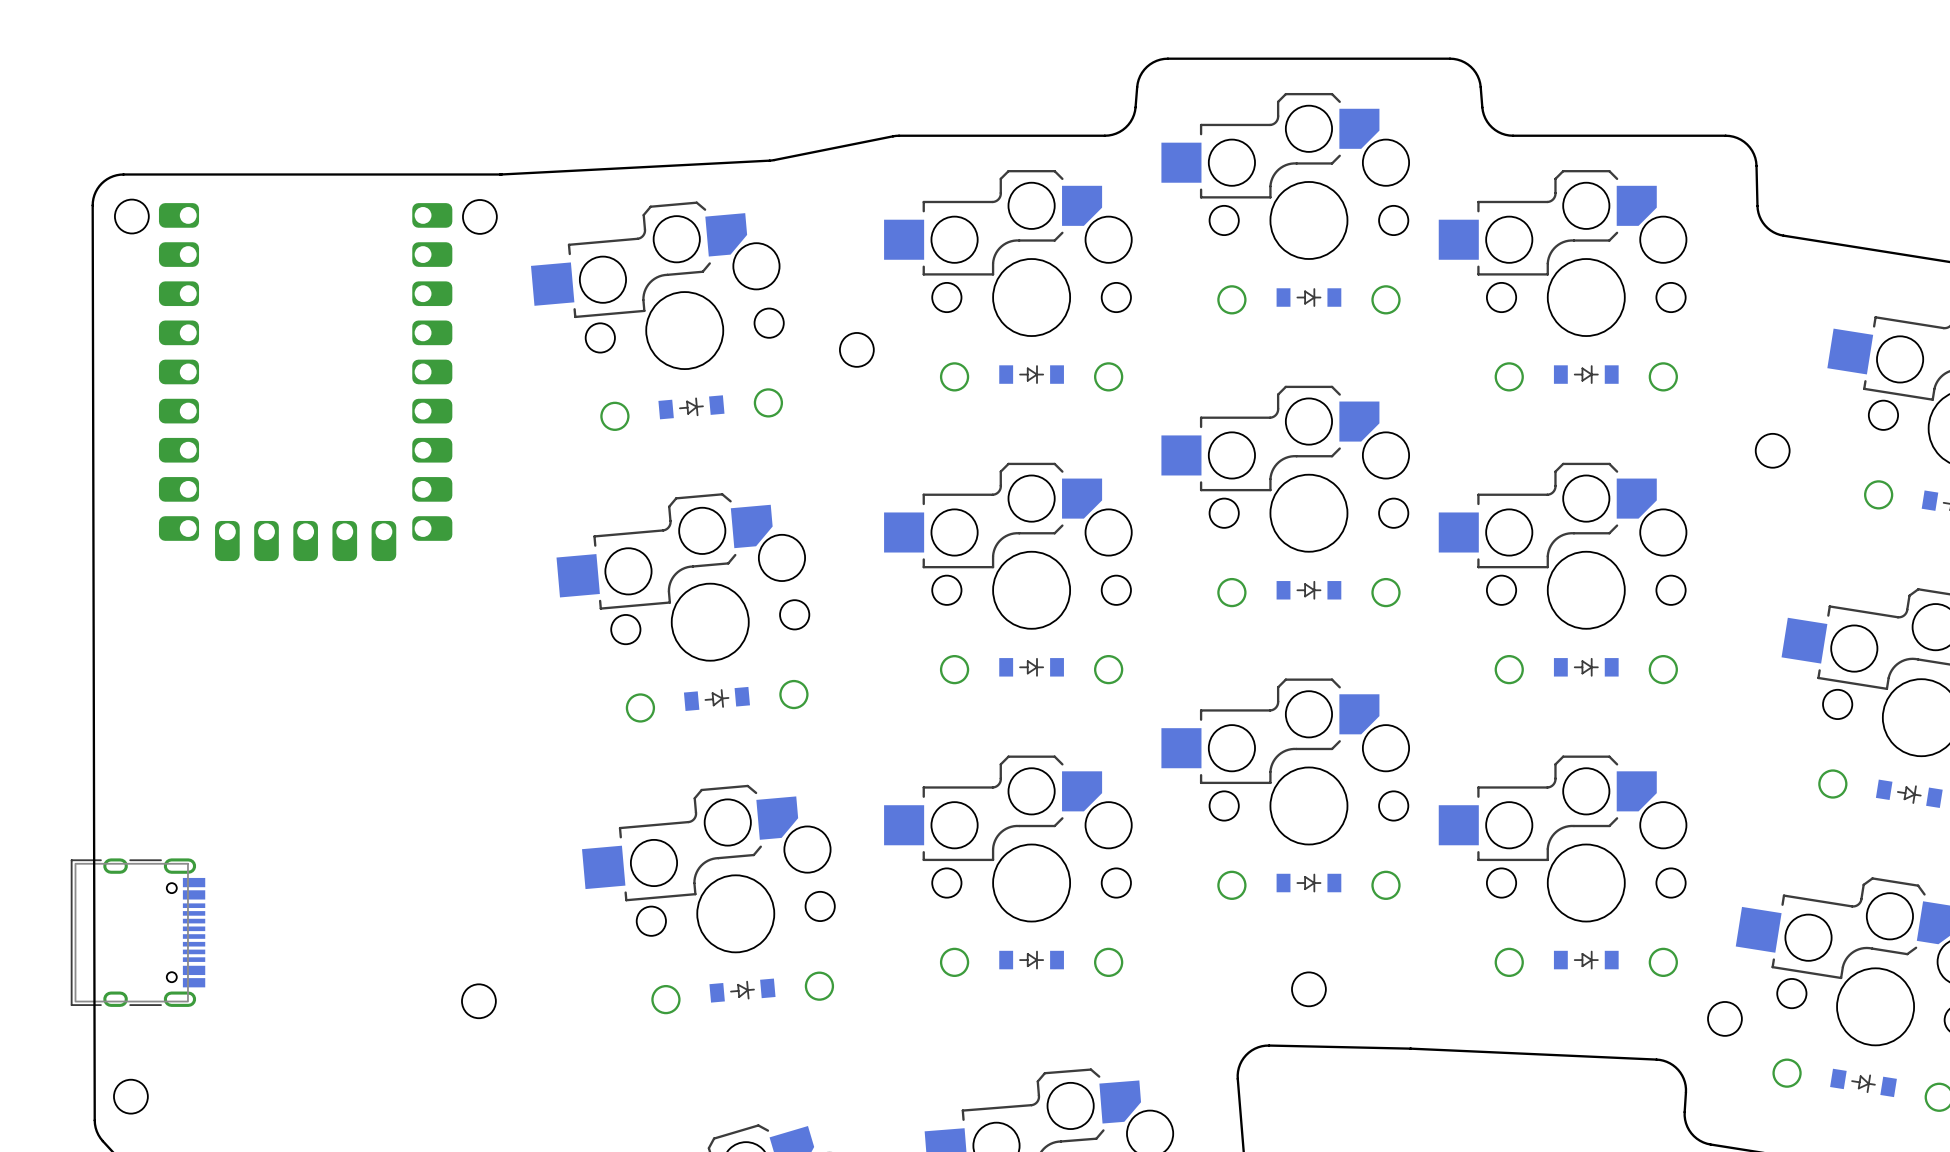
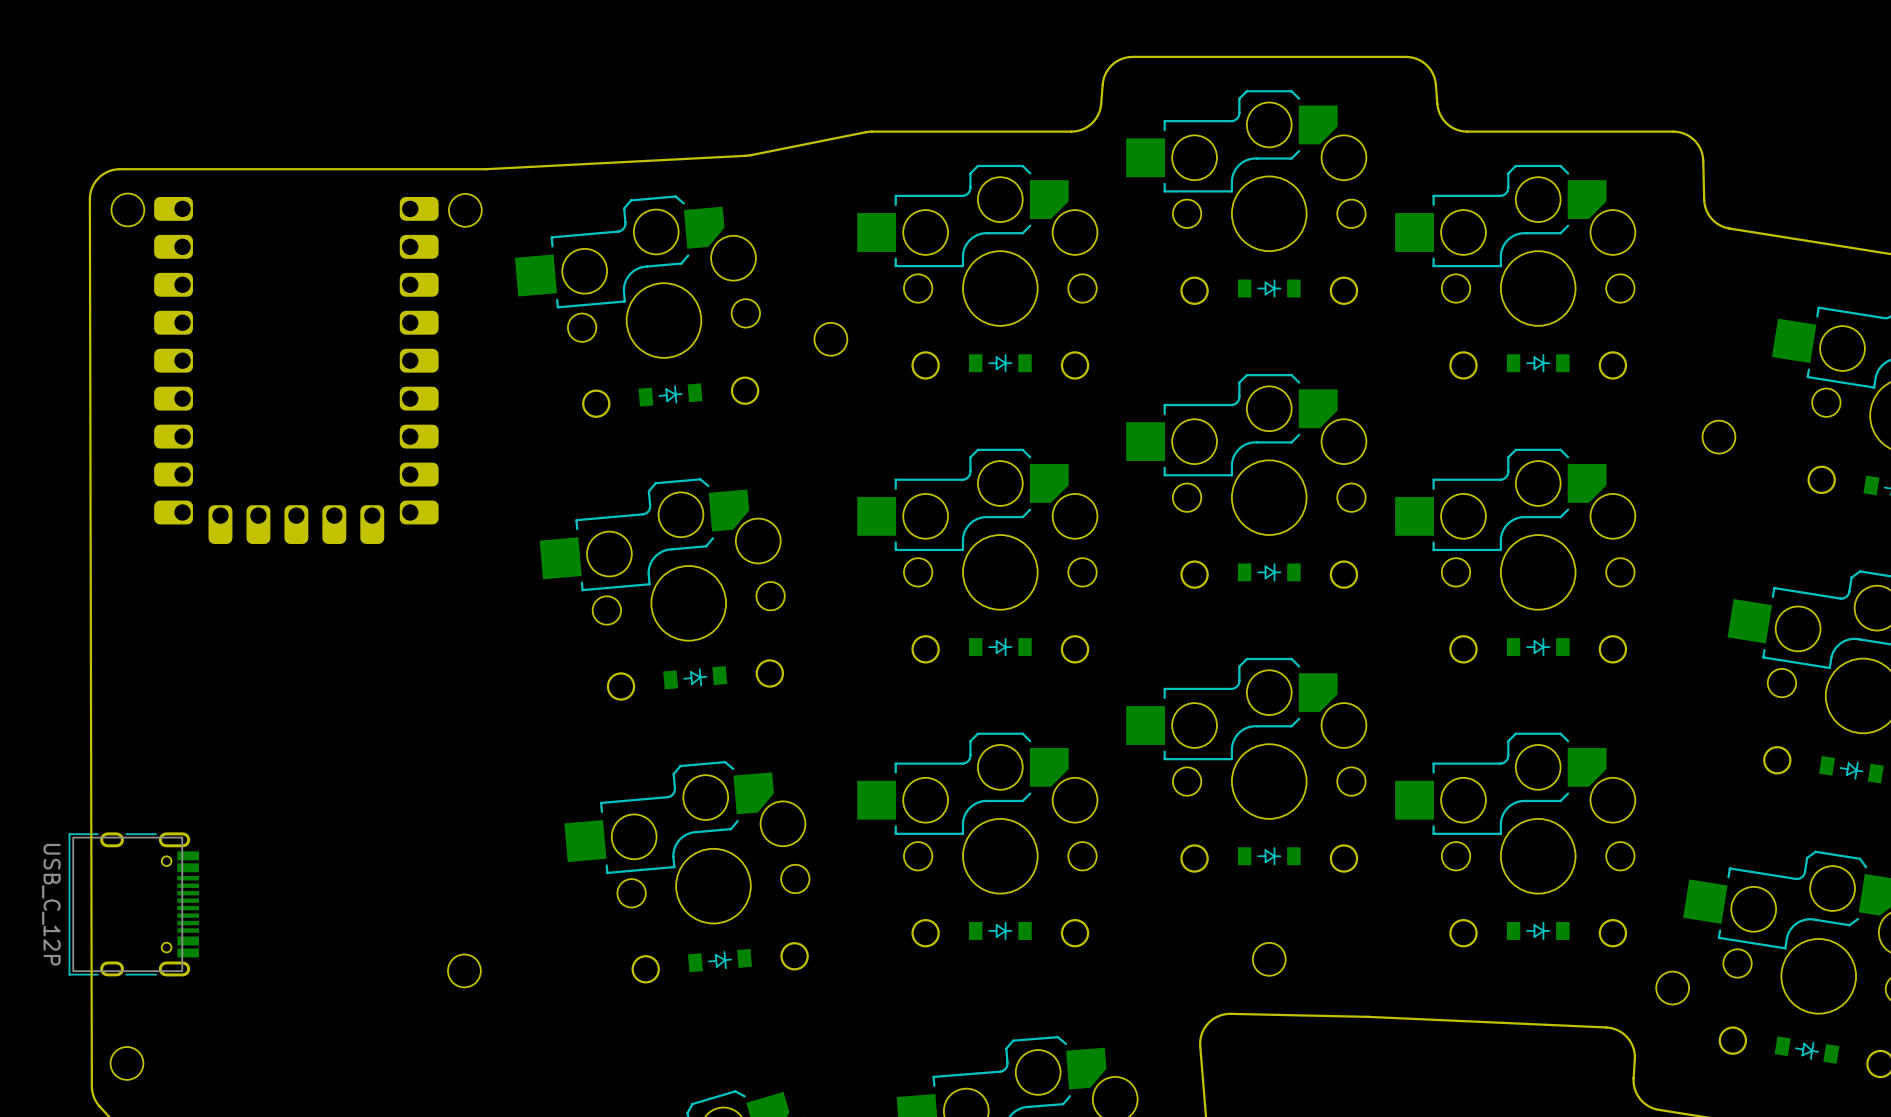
part value: none -> USB_C_12P (51, 904)

